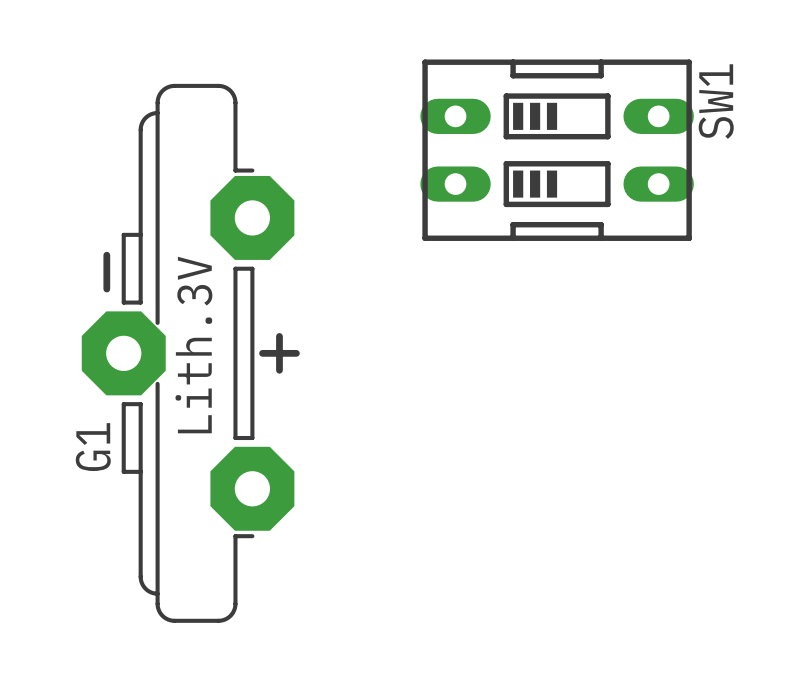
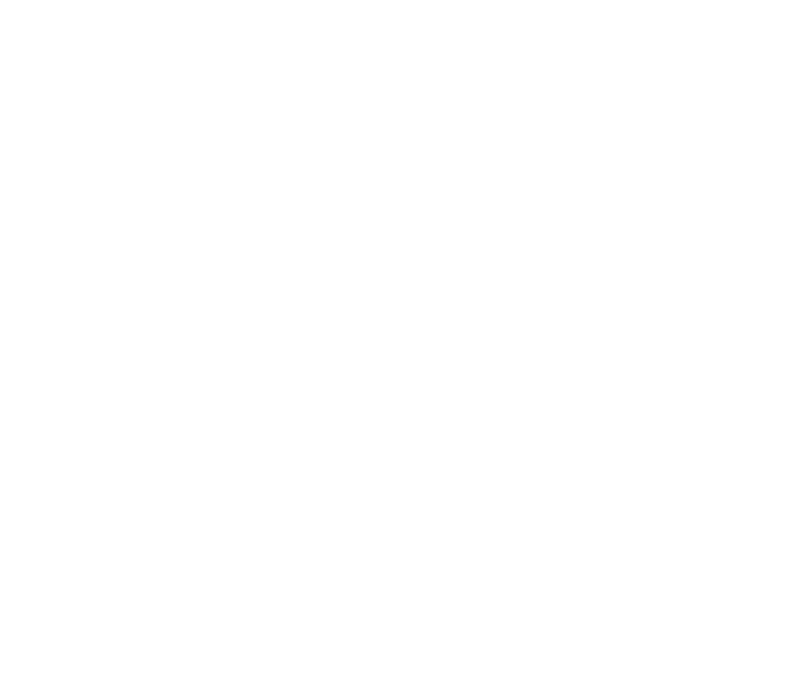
SW1: (557, 150) -> none
G1: (190, 353) -> none

